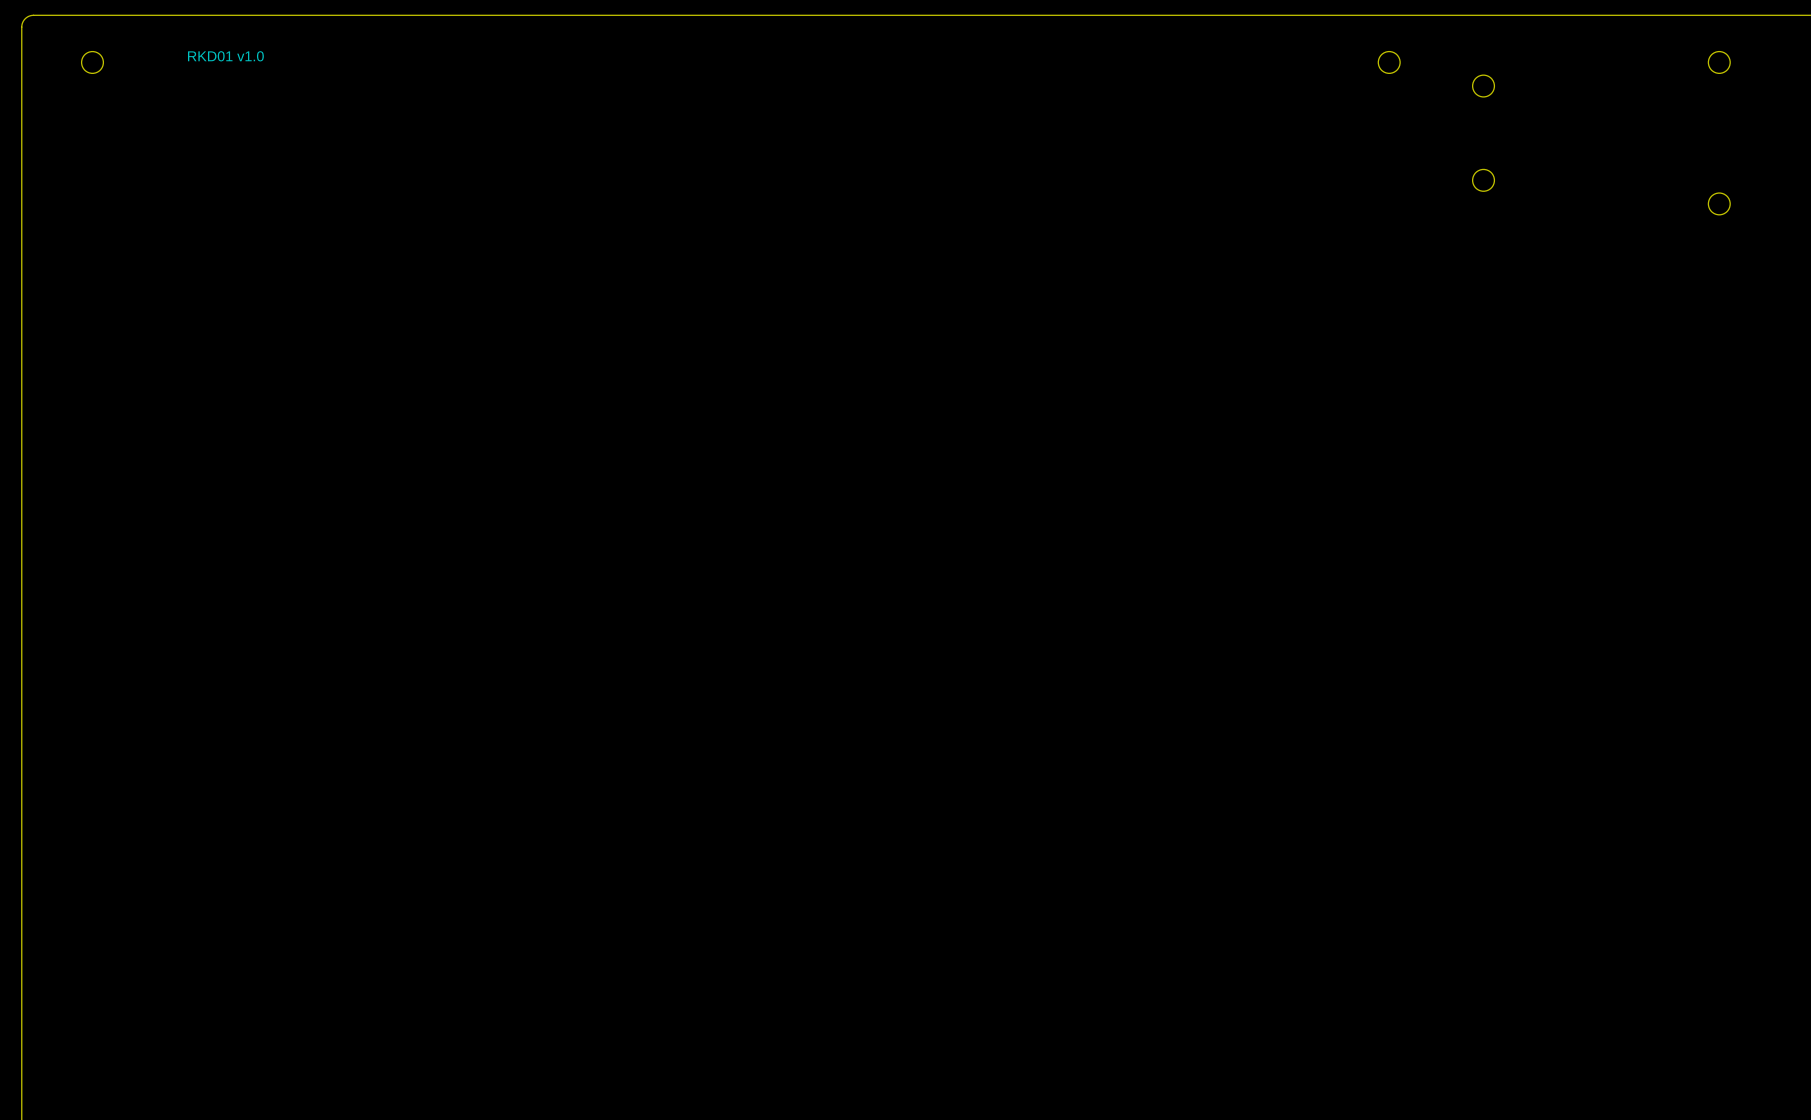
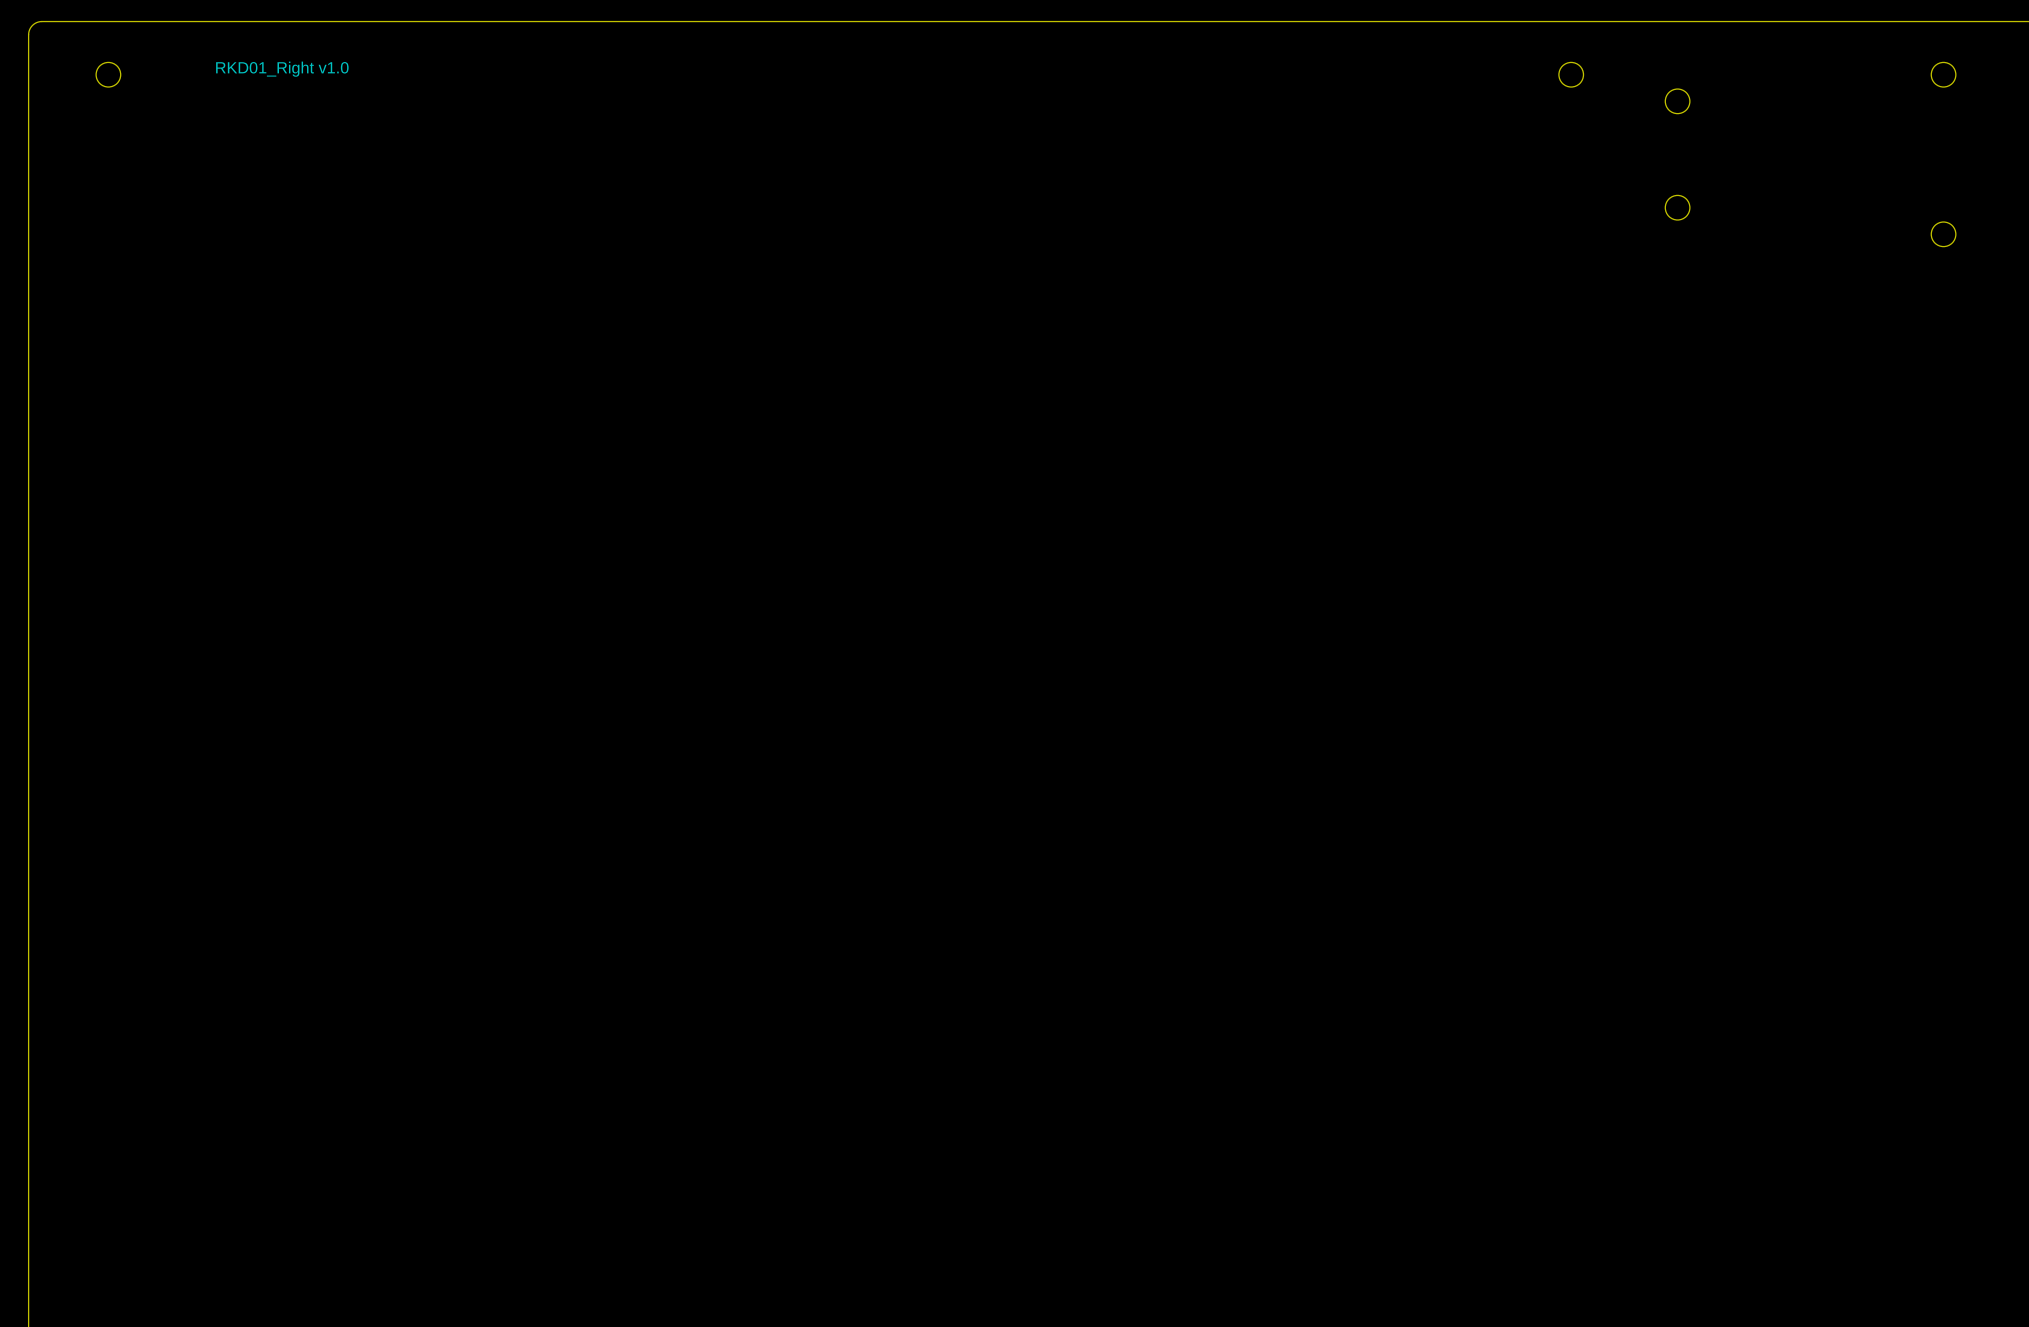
text: RKD01 v1.0 (225, 56) -> RKD01_Right v1.0 (282, 69)

